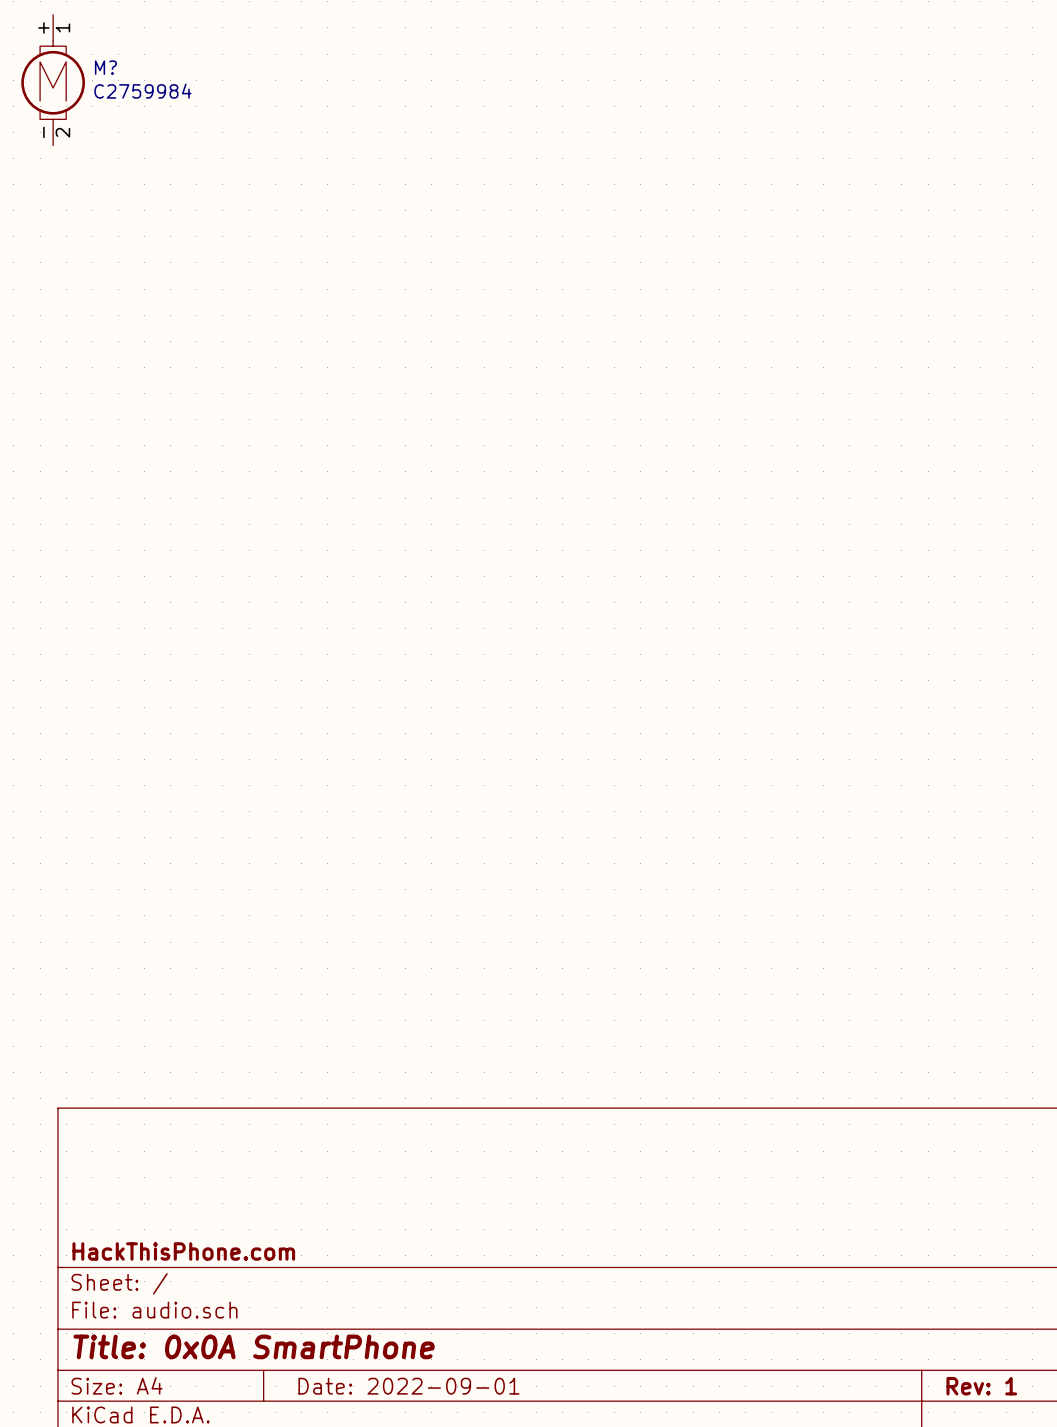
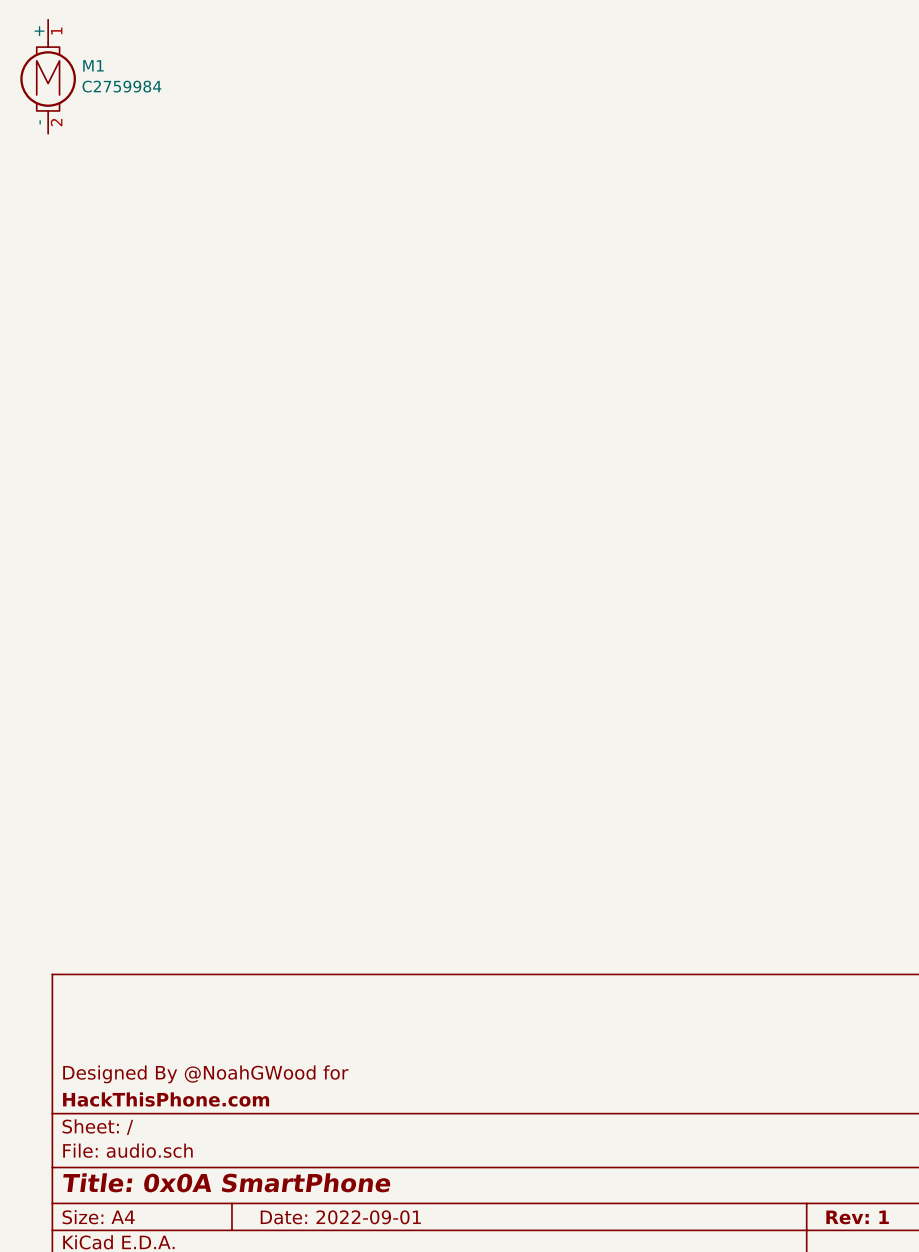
M? name: M? (105, 67) -> M1 (93, 65)
title block: none -> Designed By @NoahGWood for (205, 1074)

